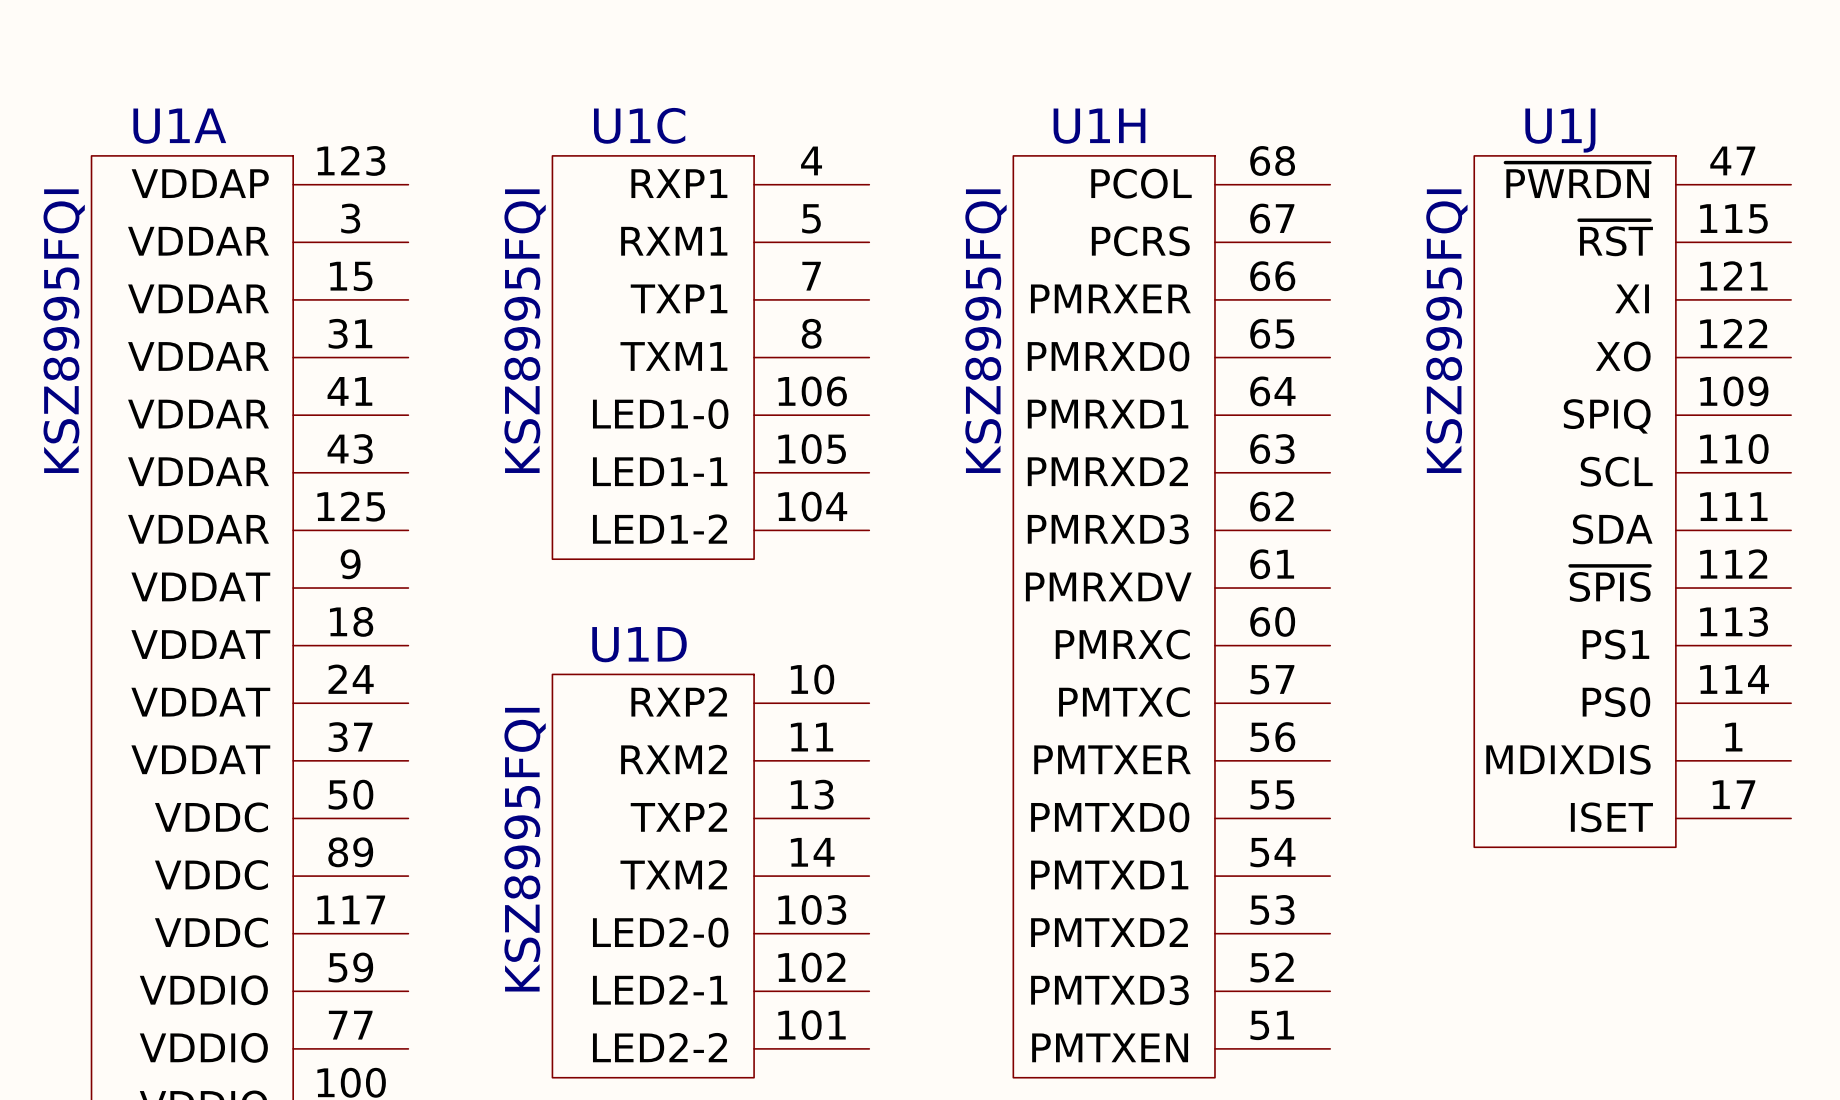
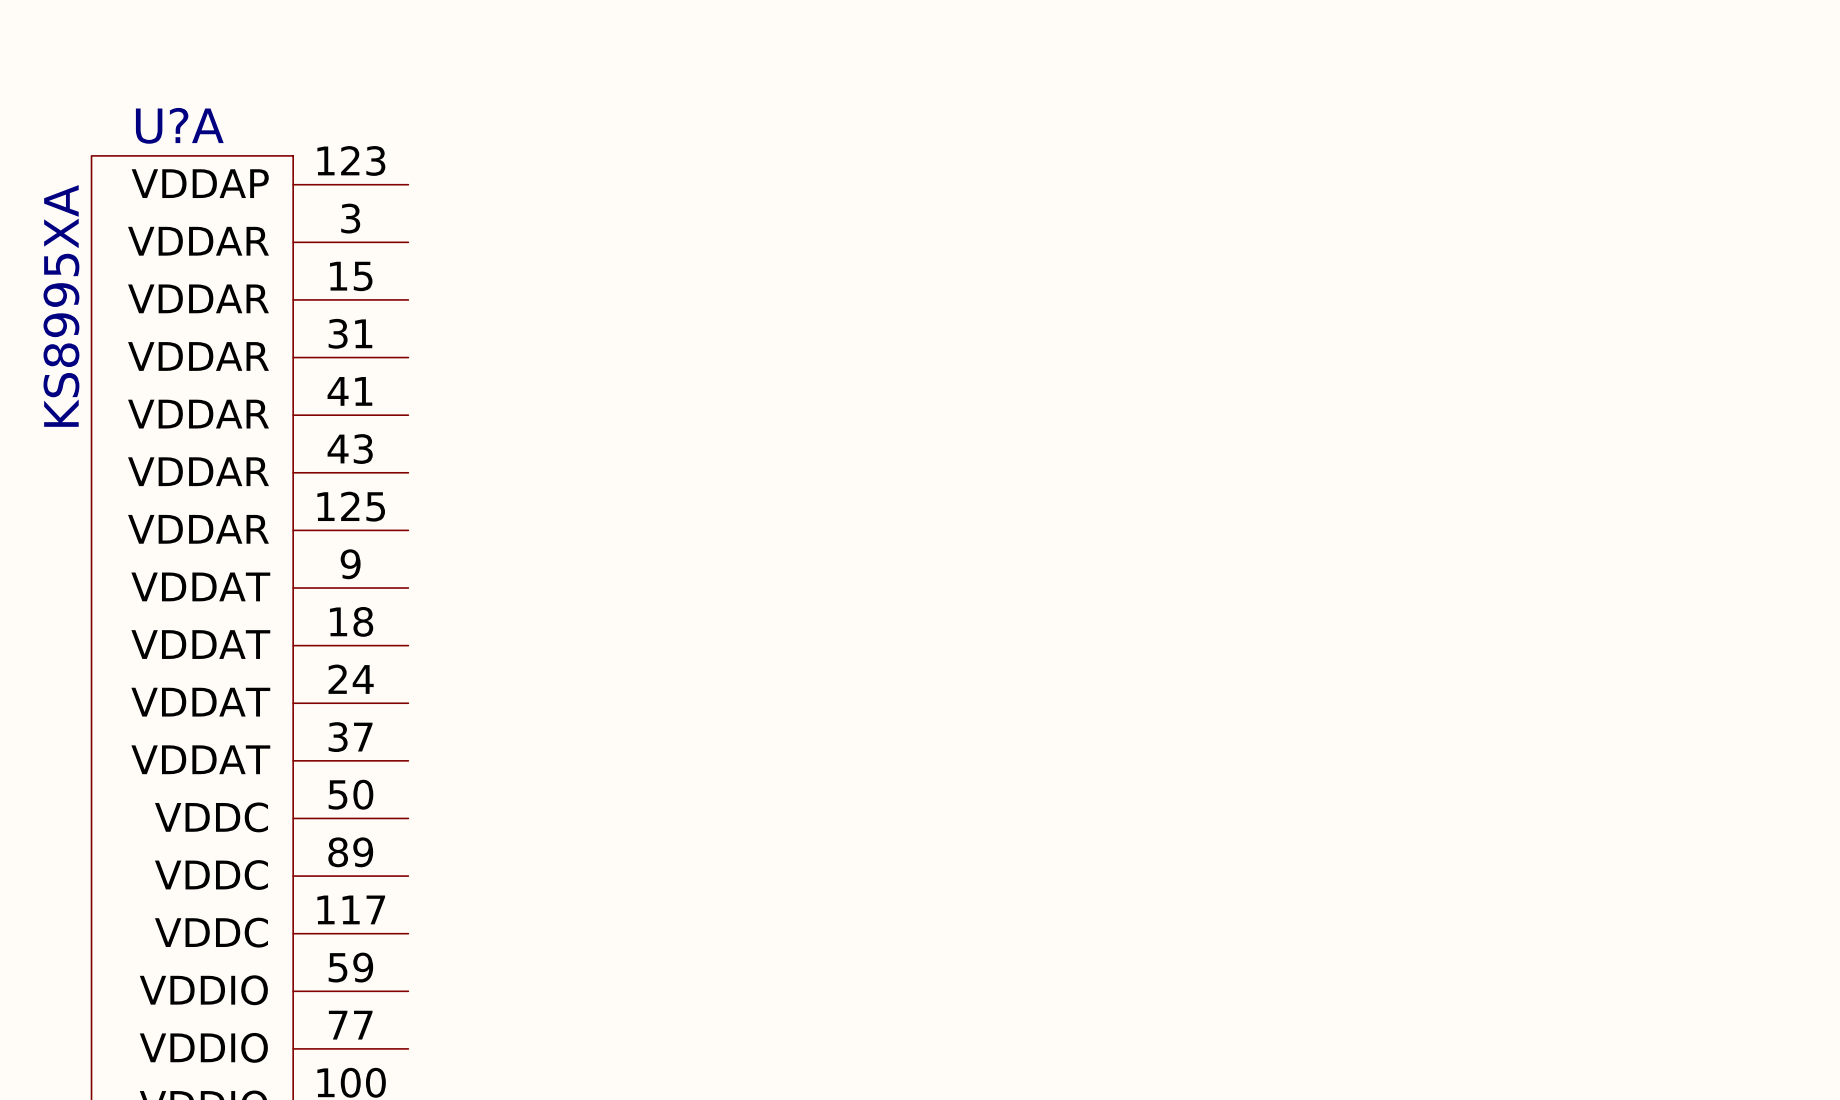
U1A name: U1A (179, 126) -> U?A (179, 125)
U1A value: KSZ8995FQI (64, 331) -> KS8995XA (61, 305)
U1C: KSZ8995FQI (710, 357) -> none
U1J: KSZ8995FQI (1632, 501) -> none
U1H: KSZ8995FQI (1171, 616) -> none
U1D: KSZ8995FQI (710, 876) -> none

